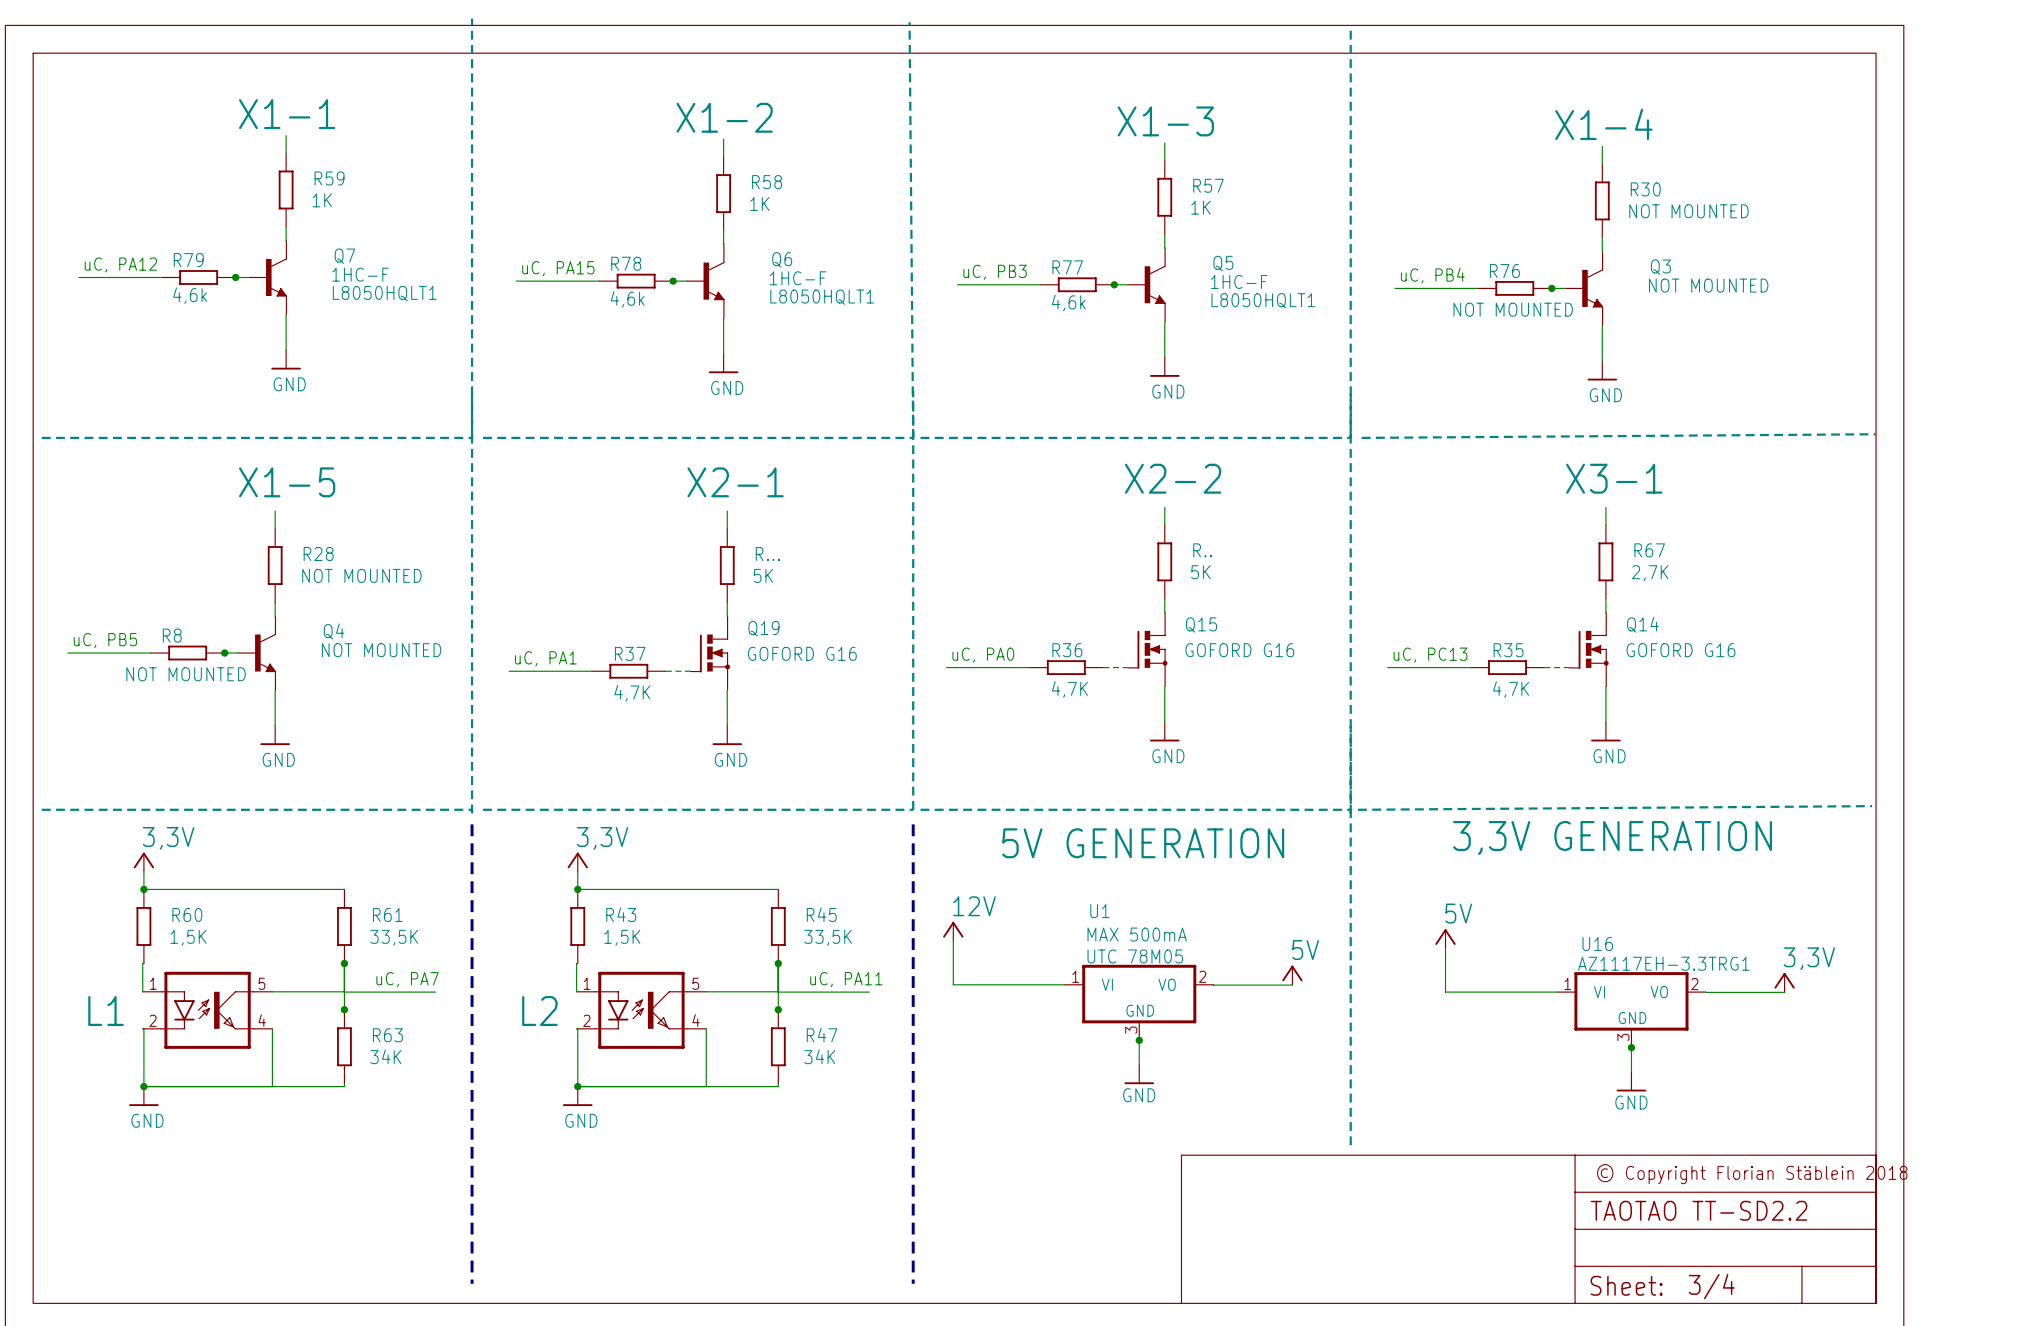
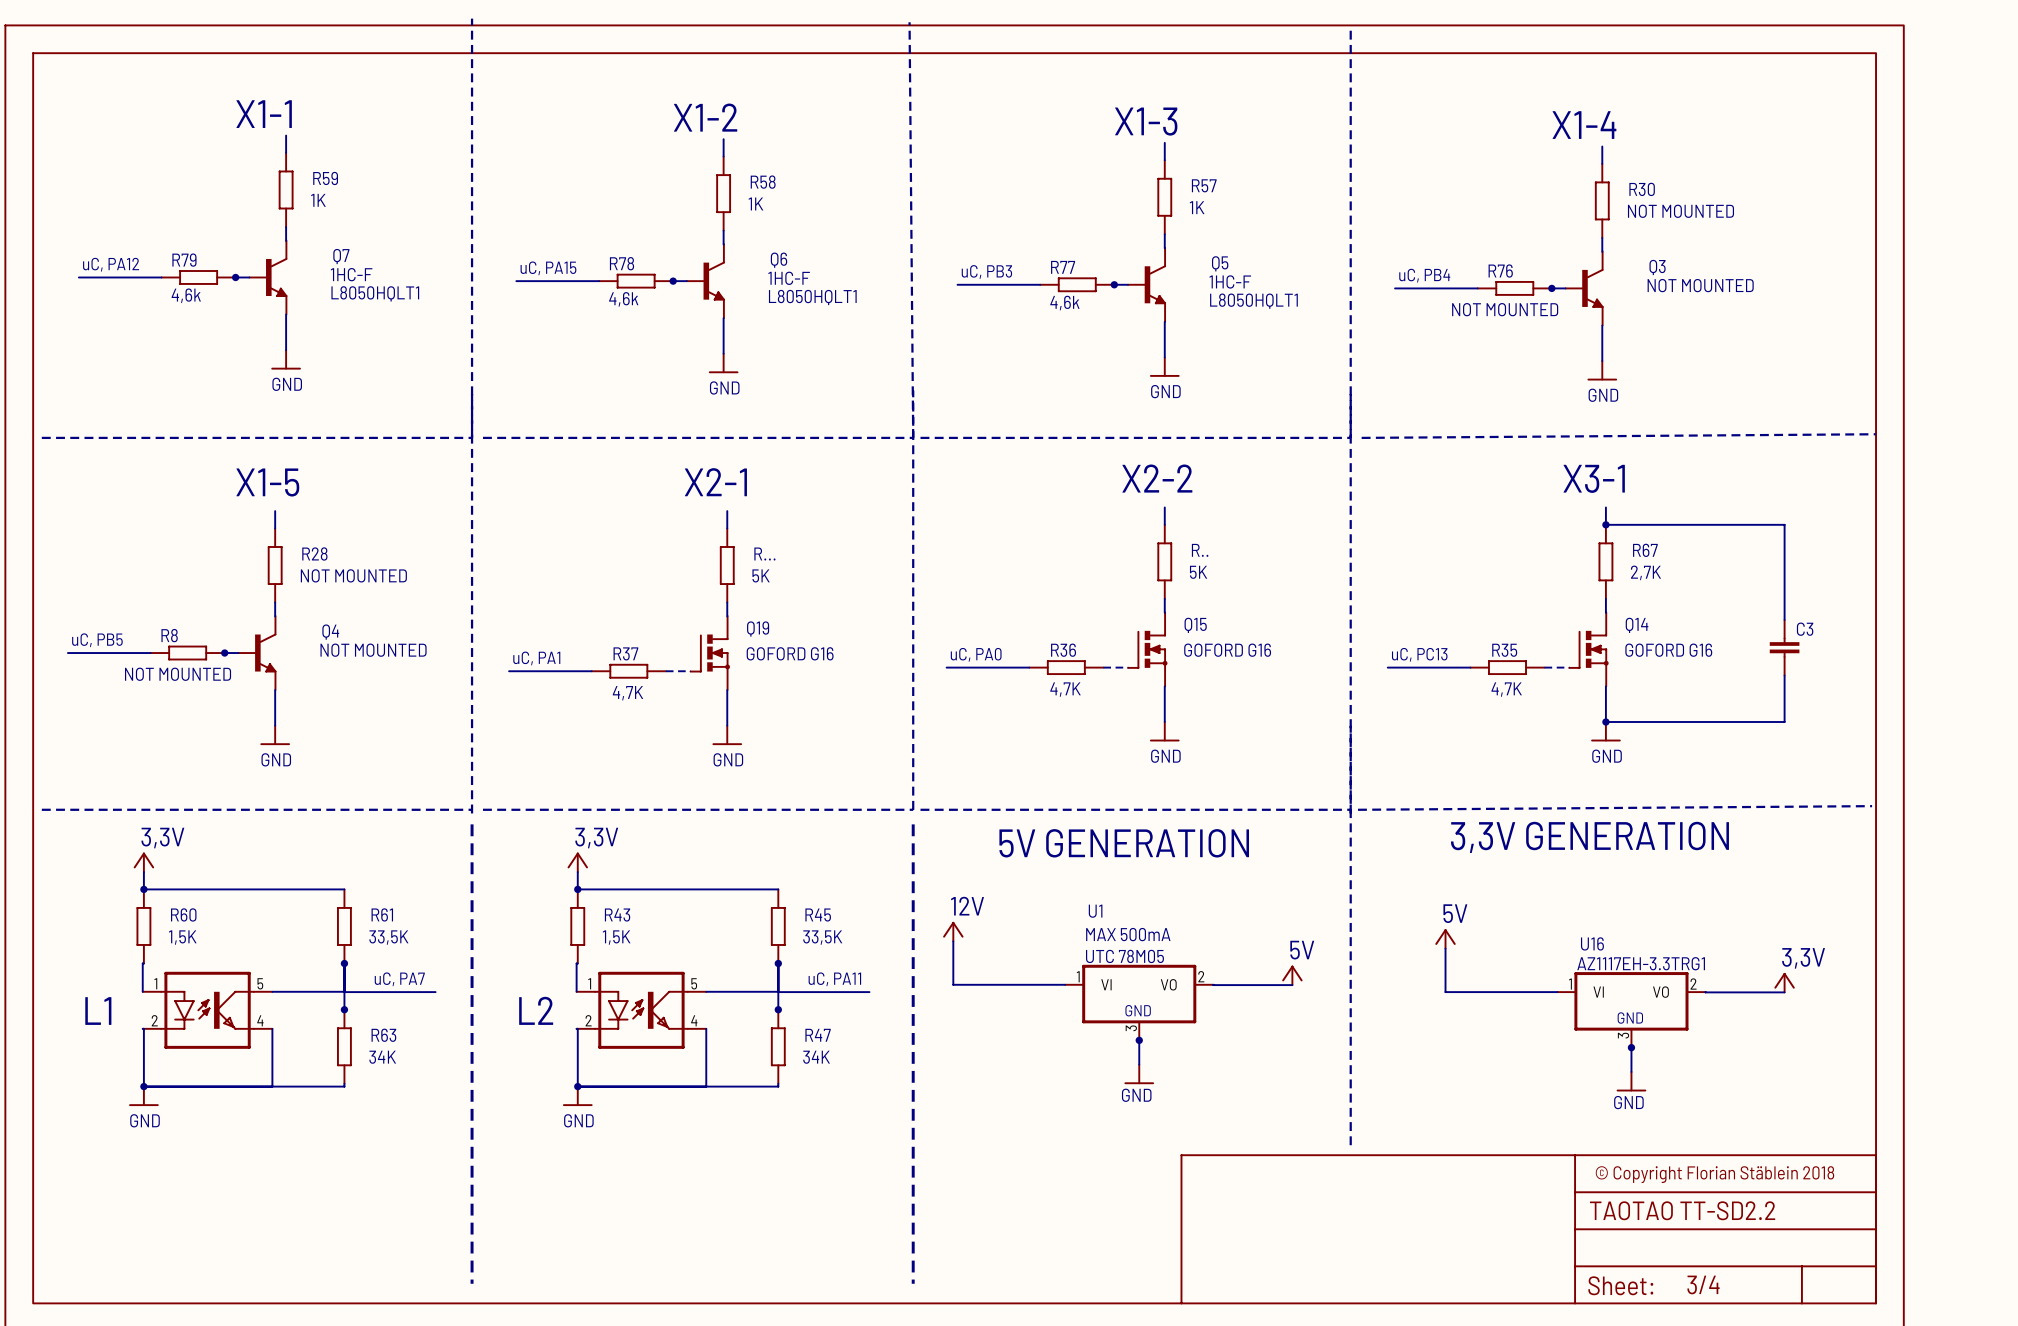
wire: none -> (1605, 524) (1784, 524) (1784, 619)
junction: none -> (1605, 524)
C3: none -> (1784, 647)
wire: none -> (1784, 675) (1784, 722) (1605, 722)
junction: none -> (1605, 722)

